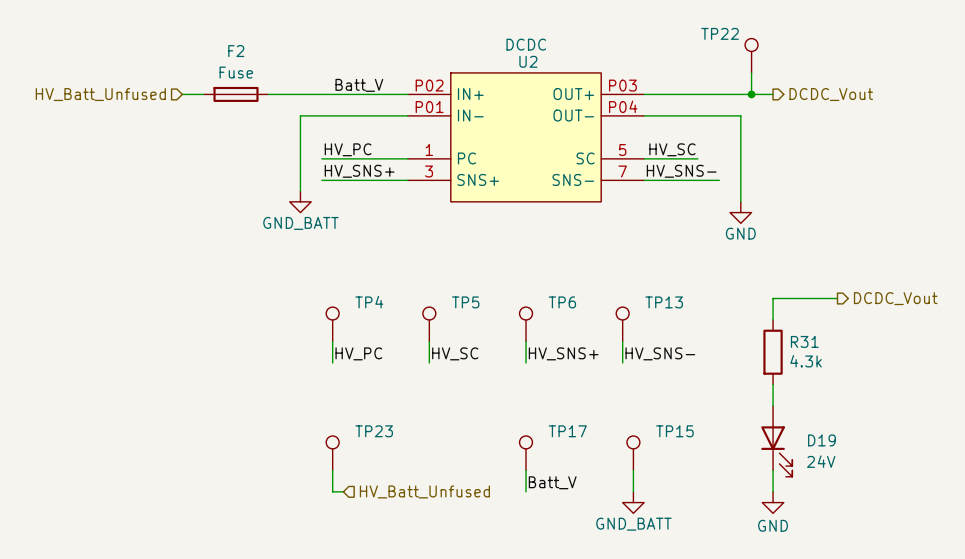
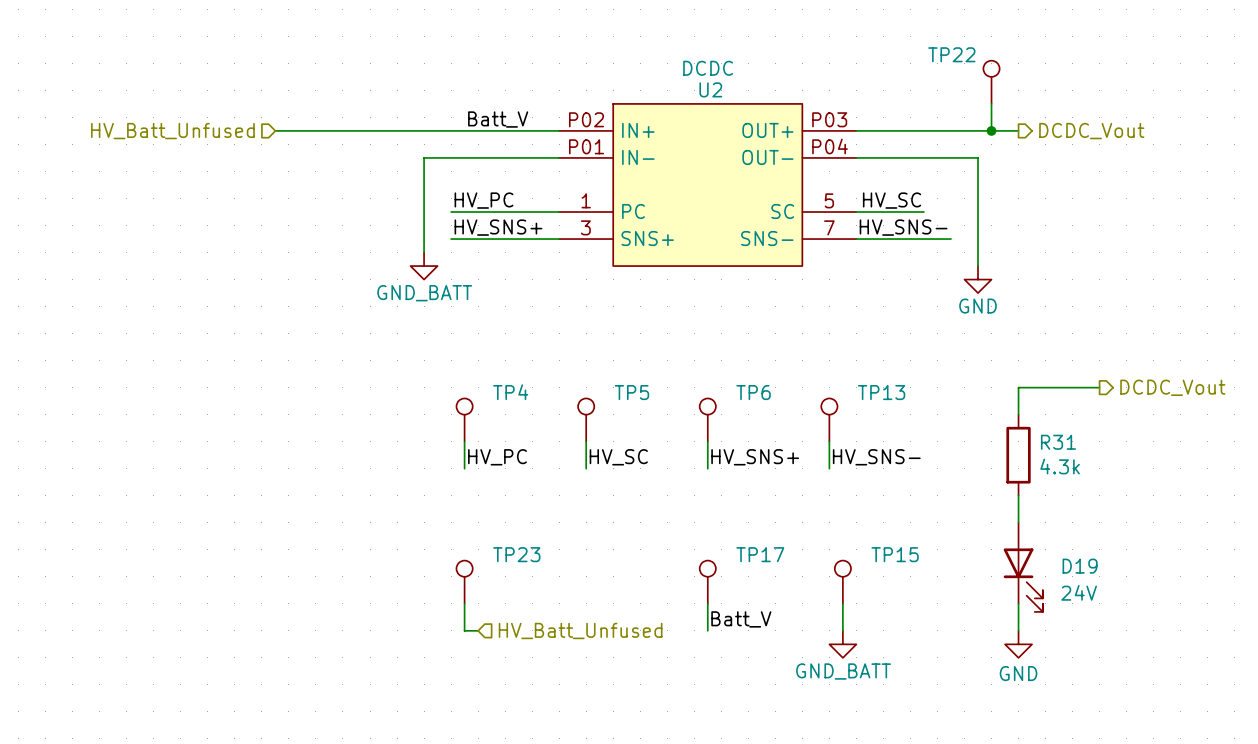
F2: Fuse (236, 94) -> none

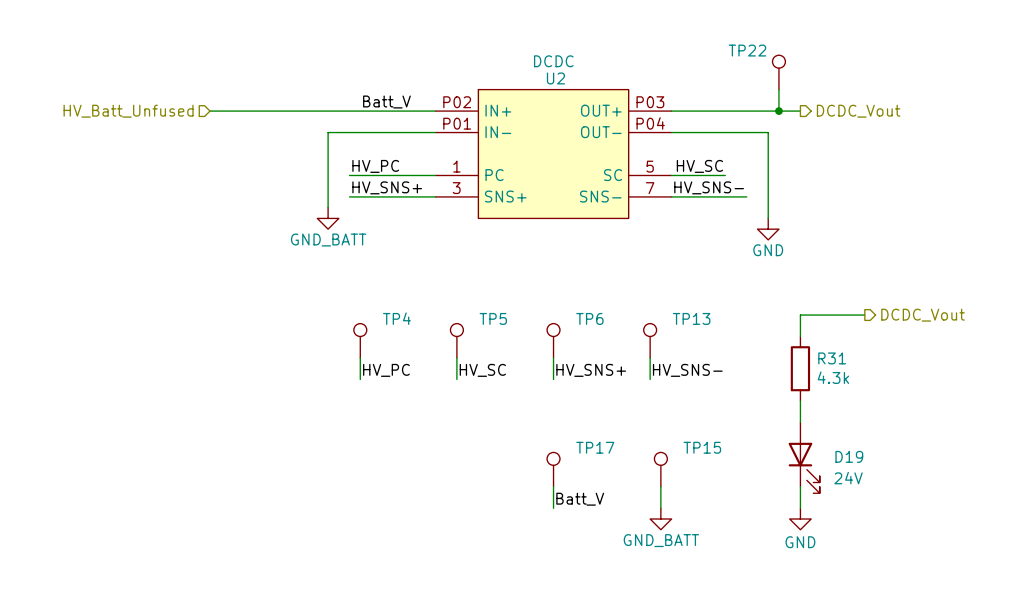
TP23: (464, 582) -> none
wire: (464, 603) (464, 630) (478, 630) -> none
hierarchical label: HV_Batt_Unfused (580, 630) -> none

